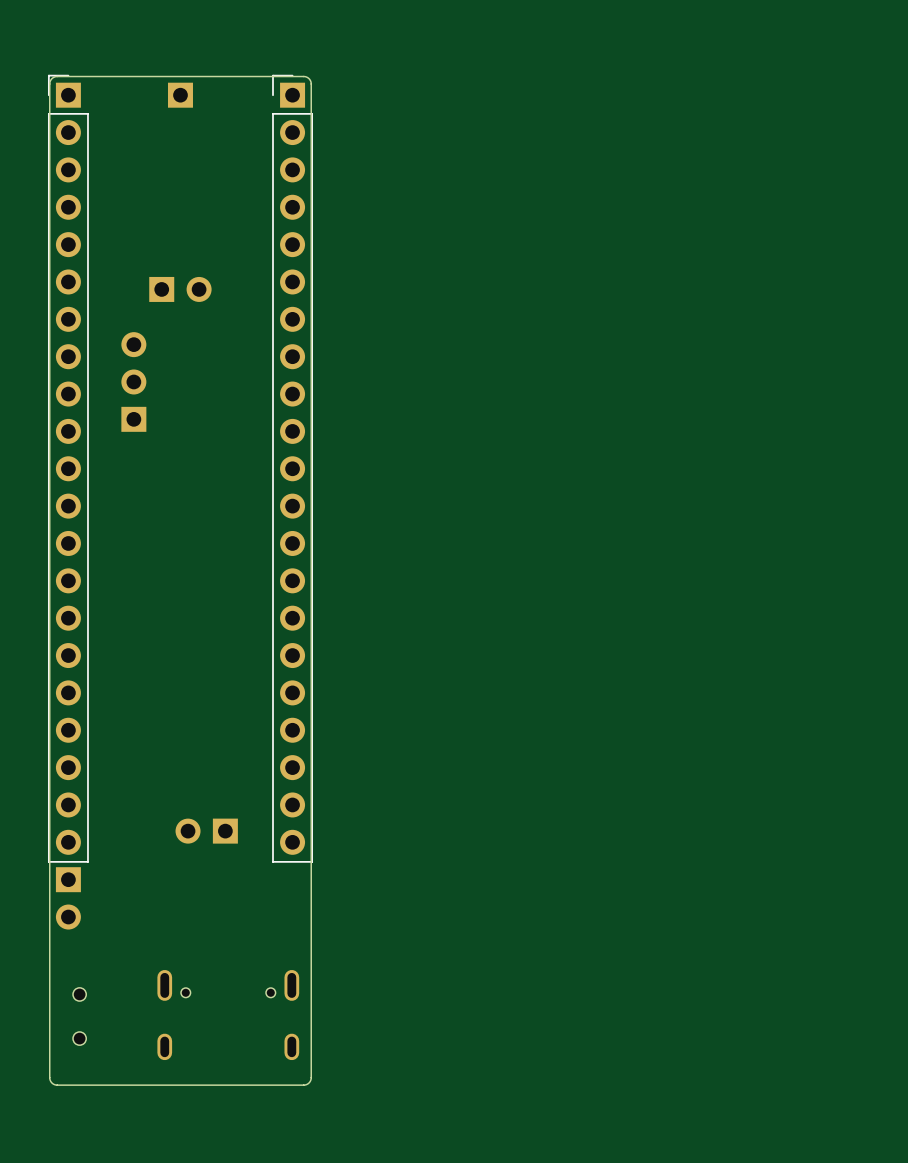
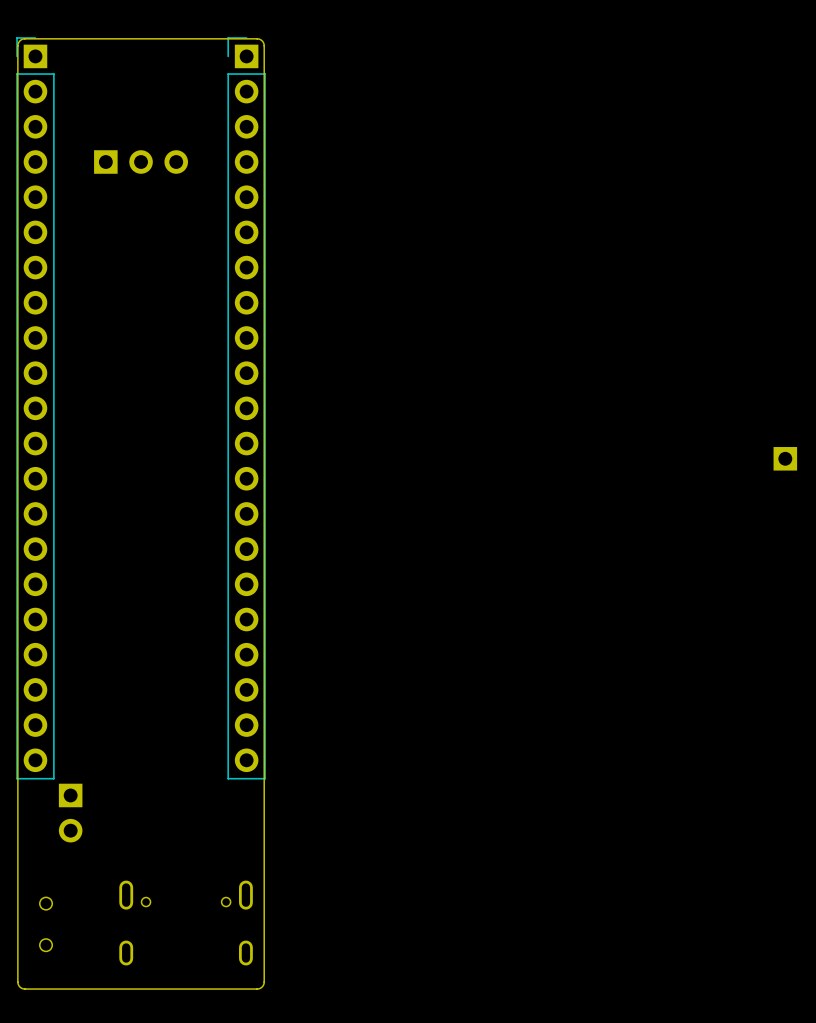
part: (180, 95) -> none
part: (180, 289) -> none
part rotation: 0° (133, 381) -> 90° clockwise (141, 162)
part position: (133, 381) -> (141, 162)
part: none -> (785, 458)
part: (206, 831) -> none
part position: (68, 898) -> (70, 813)

